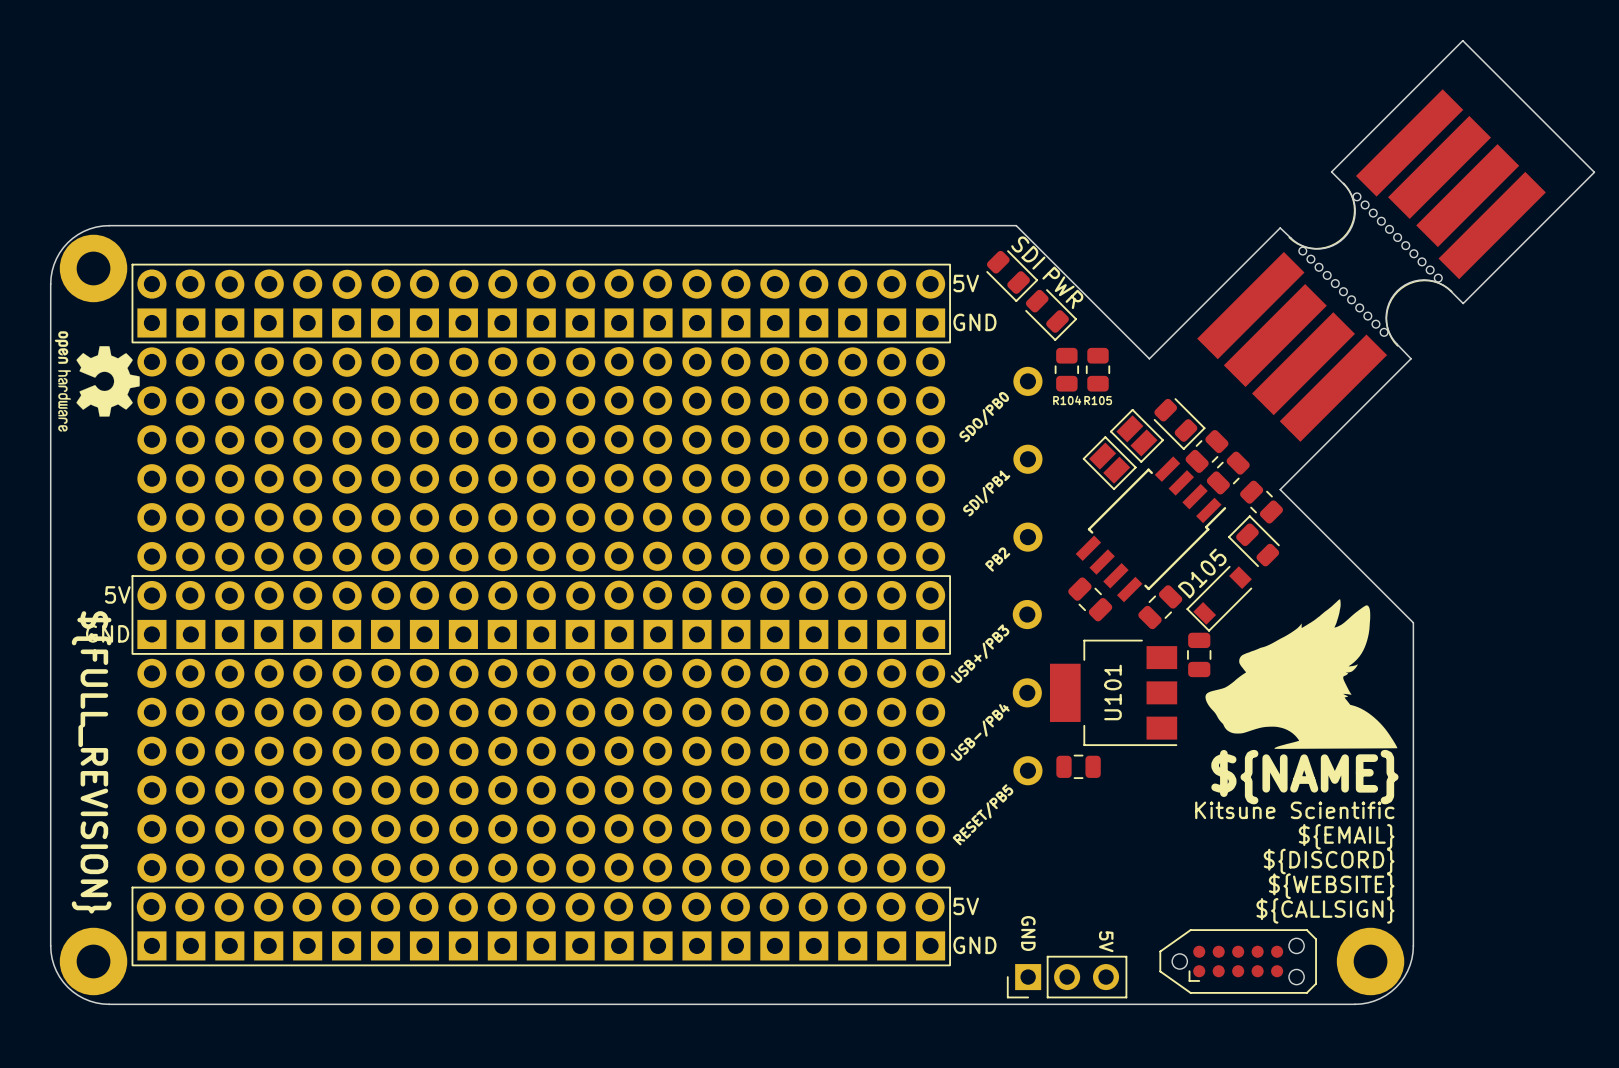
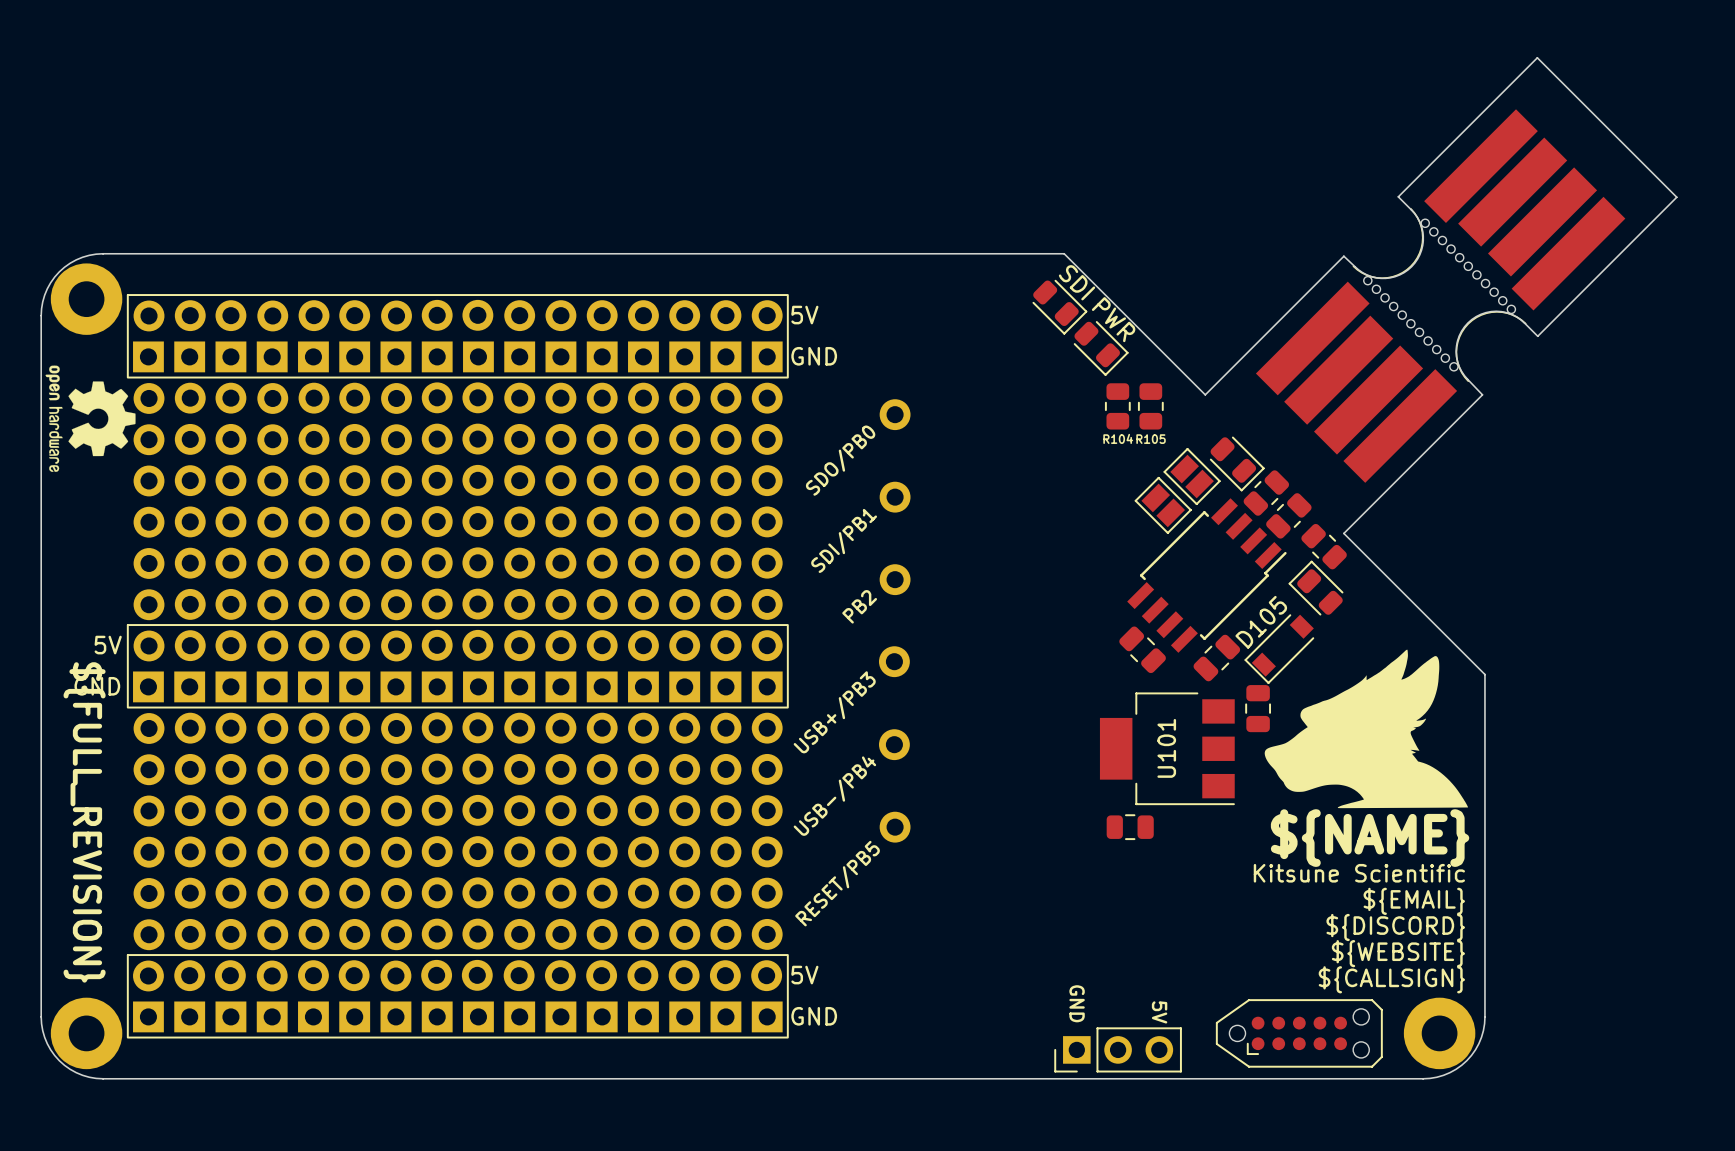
part: none -> (518, 666)
part: (587, 614) -> none

